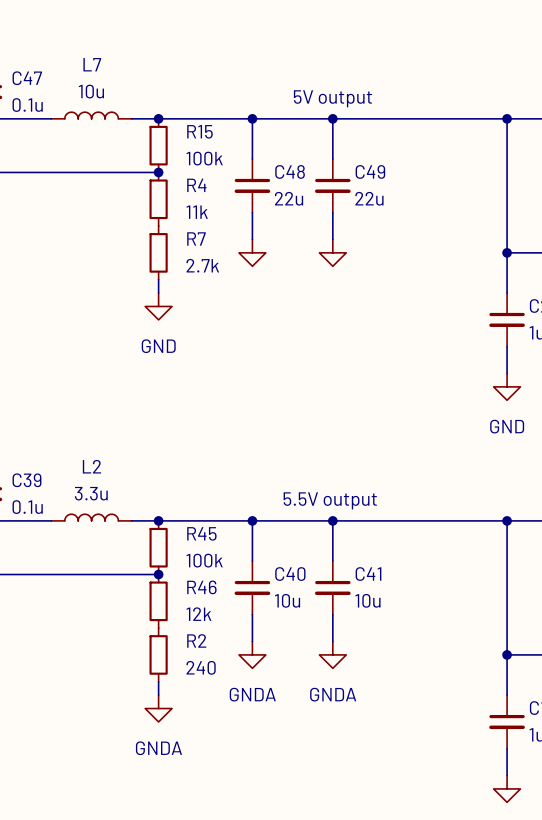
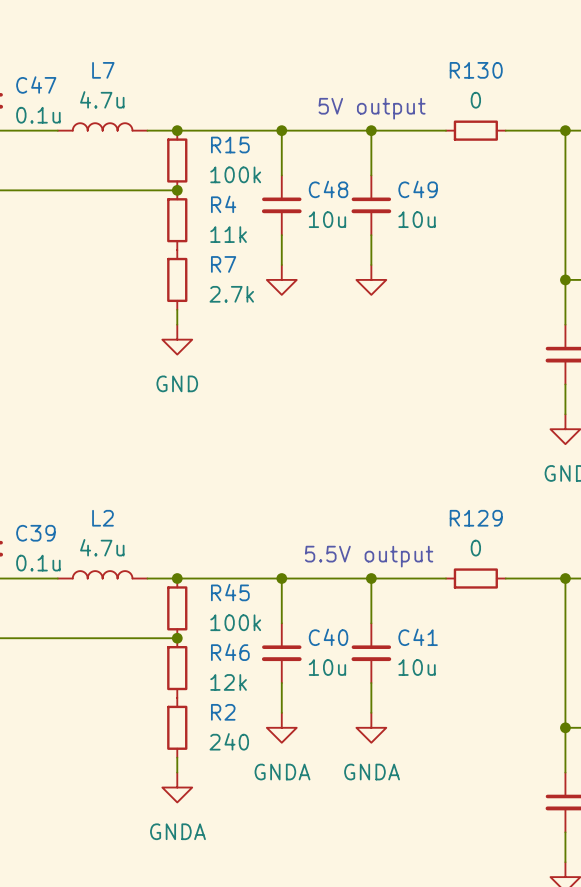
L7 value: 10u (91, 91) -> 4.7u (102, 99)
wire: (399, 118) (453, 118) -> none
R130: none -> 0 (475, 130)
C48 value: 22u (289, 198) -> 10u (327, 219)
C49 value: 22u (369, 198) -> 10u (417, 219)
L2 value: 3.3u (91, 493) -> 4.7u (102, 547)
wire: (399, 520) (453, 520) -> none
R129: none -> 0 (475, 578)

